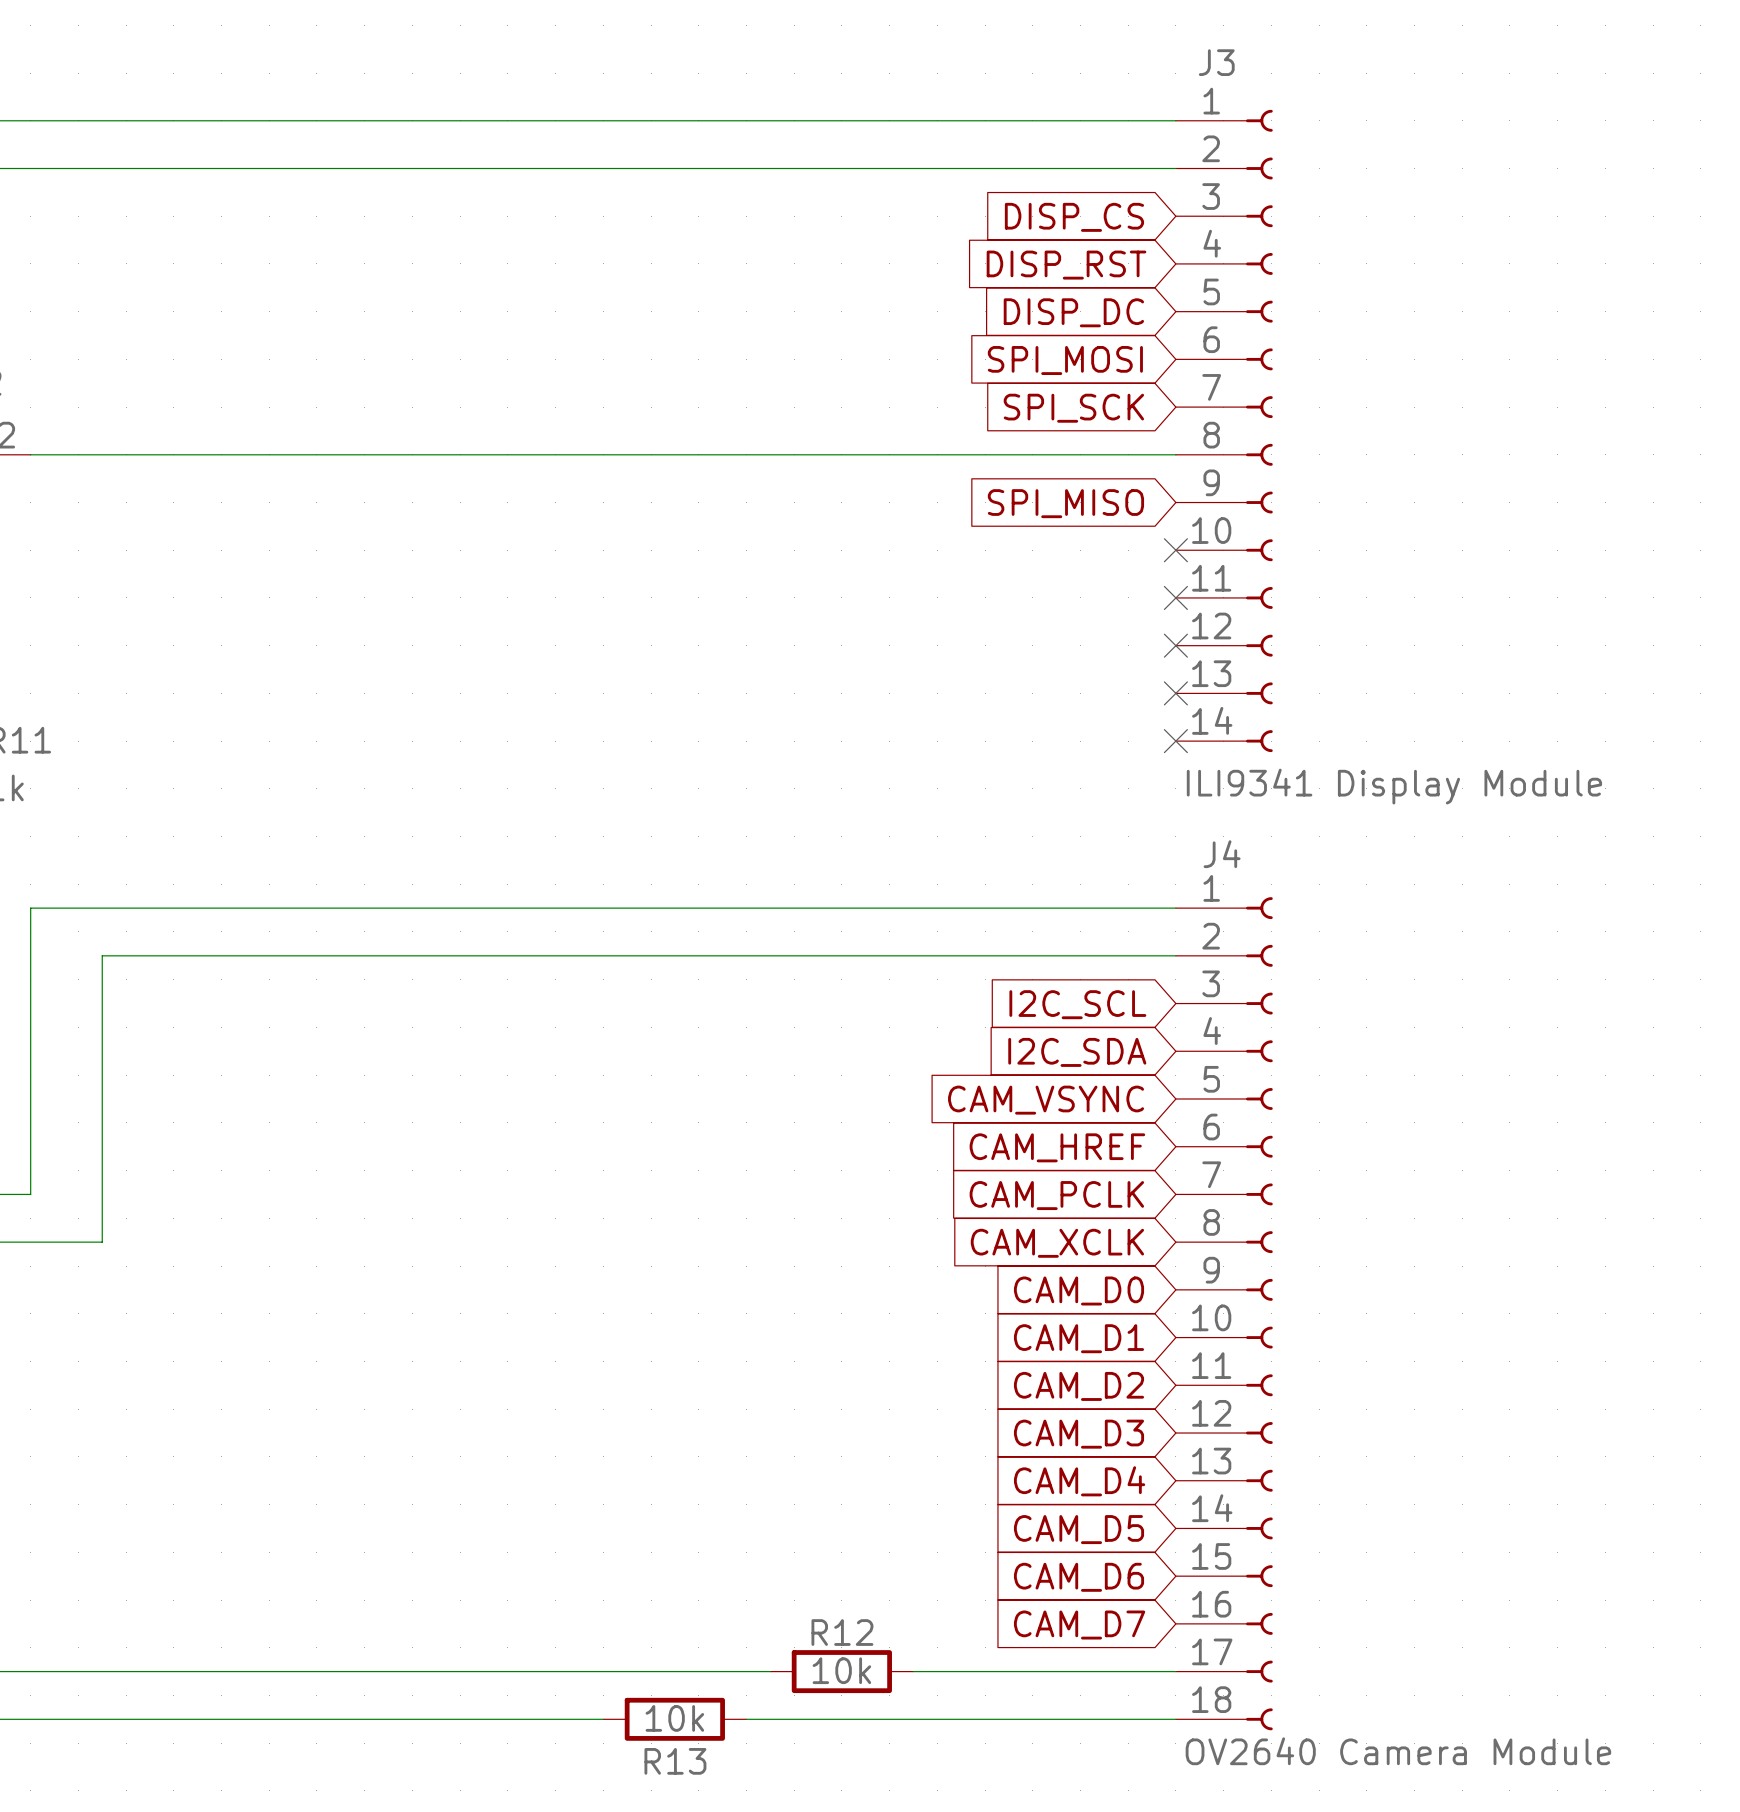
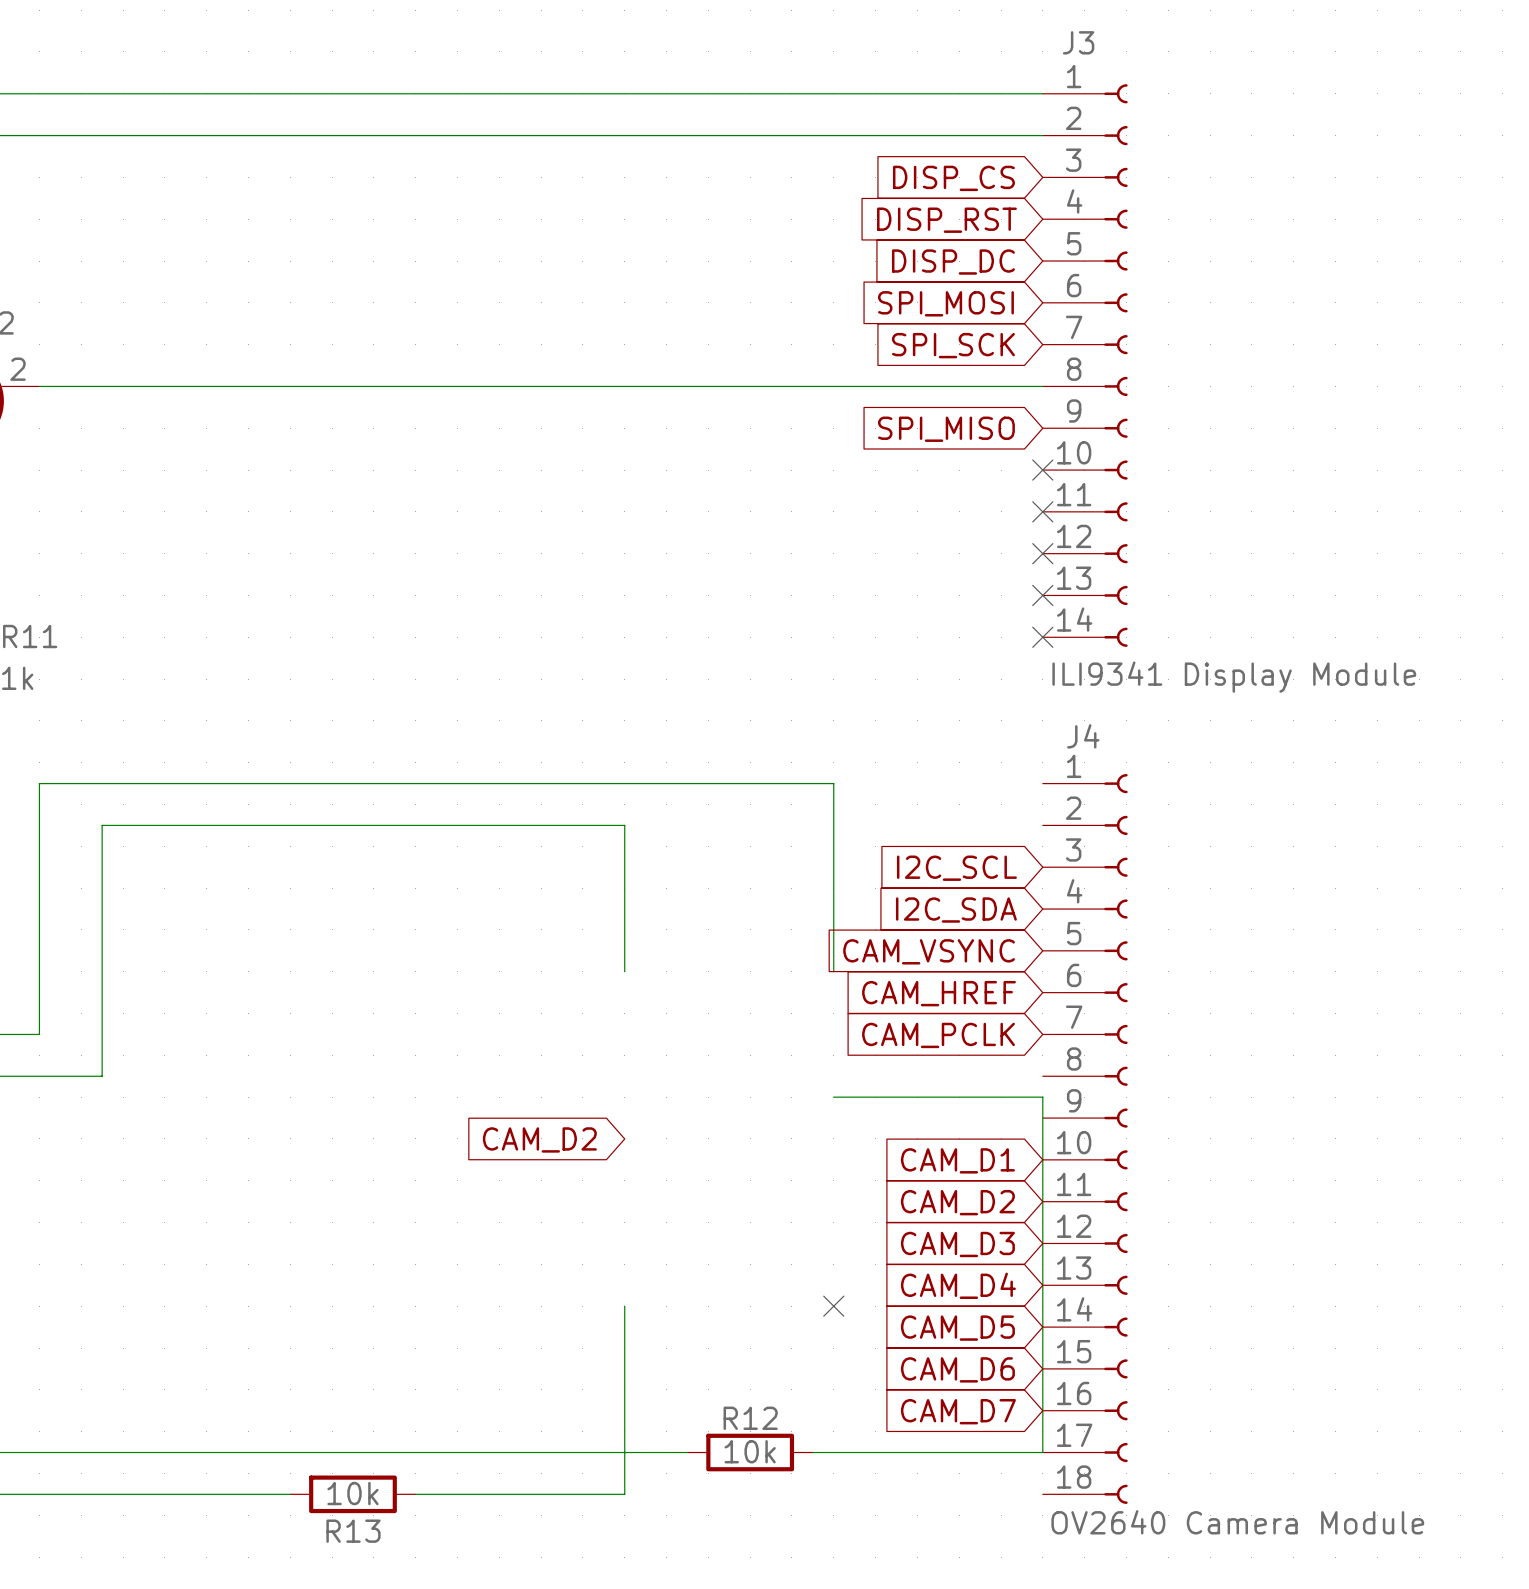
wire: (937, 908) (1175, 908) -> (833, 783) (833, 971)
wire: (698, 955) (1175, 955) -> (624, 825) (624, 971)
global label: CAM_XCLK (1057, 1243) -> none
wire: none -> (833, 1097) (1042, 1097) (1042, 1452)
global label: CAM_D0 (1079, 1290) -> none
global label: none -> CAM_D2 (539, 1139)
wire: none -> (624, 1306) (624, 1494) (541, 1494)
no-connect mark: none -> (833, 1306)
wire: (316, 1719) (460, 1719) -> none
R13 position: (674, 1719) -> (352, 1494)
wire: (746, 1719) (1175, 1719) -> none

